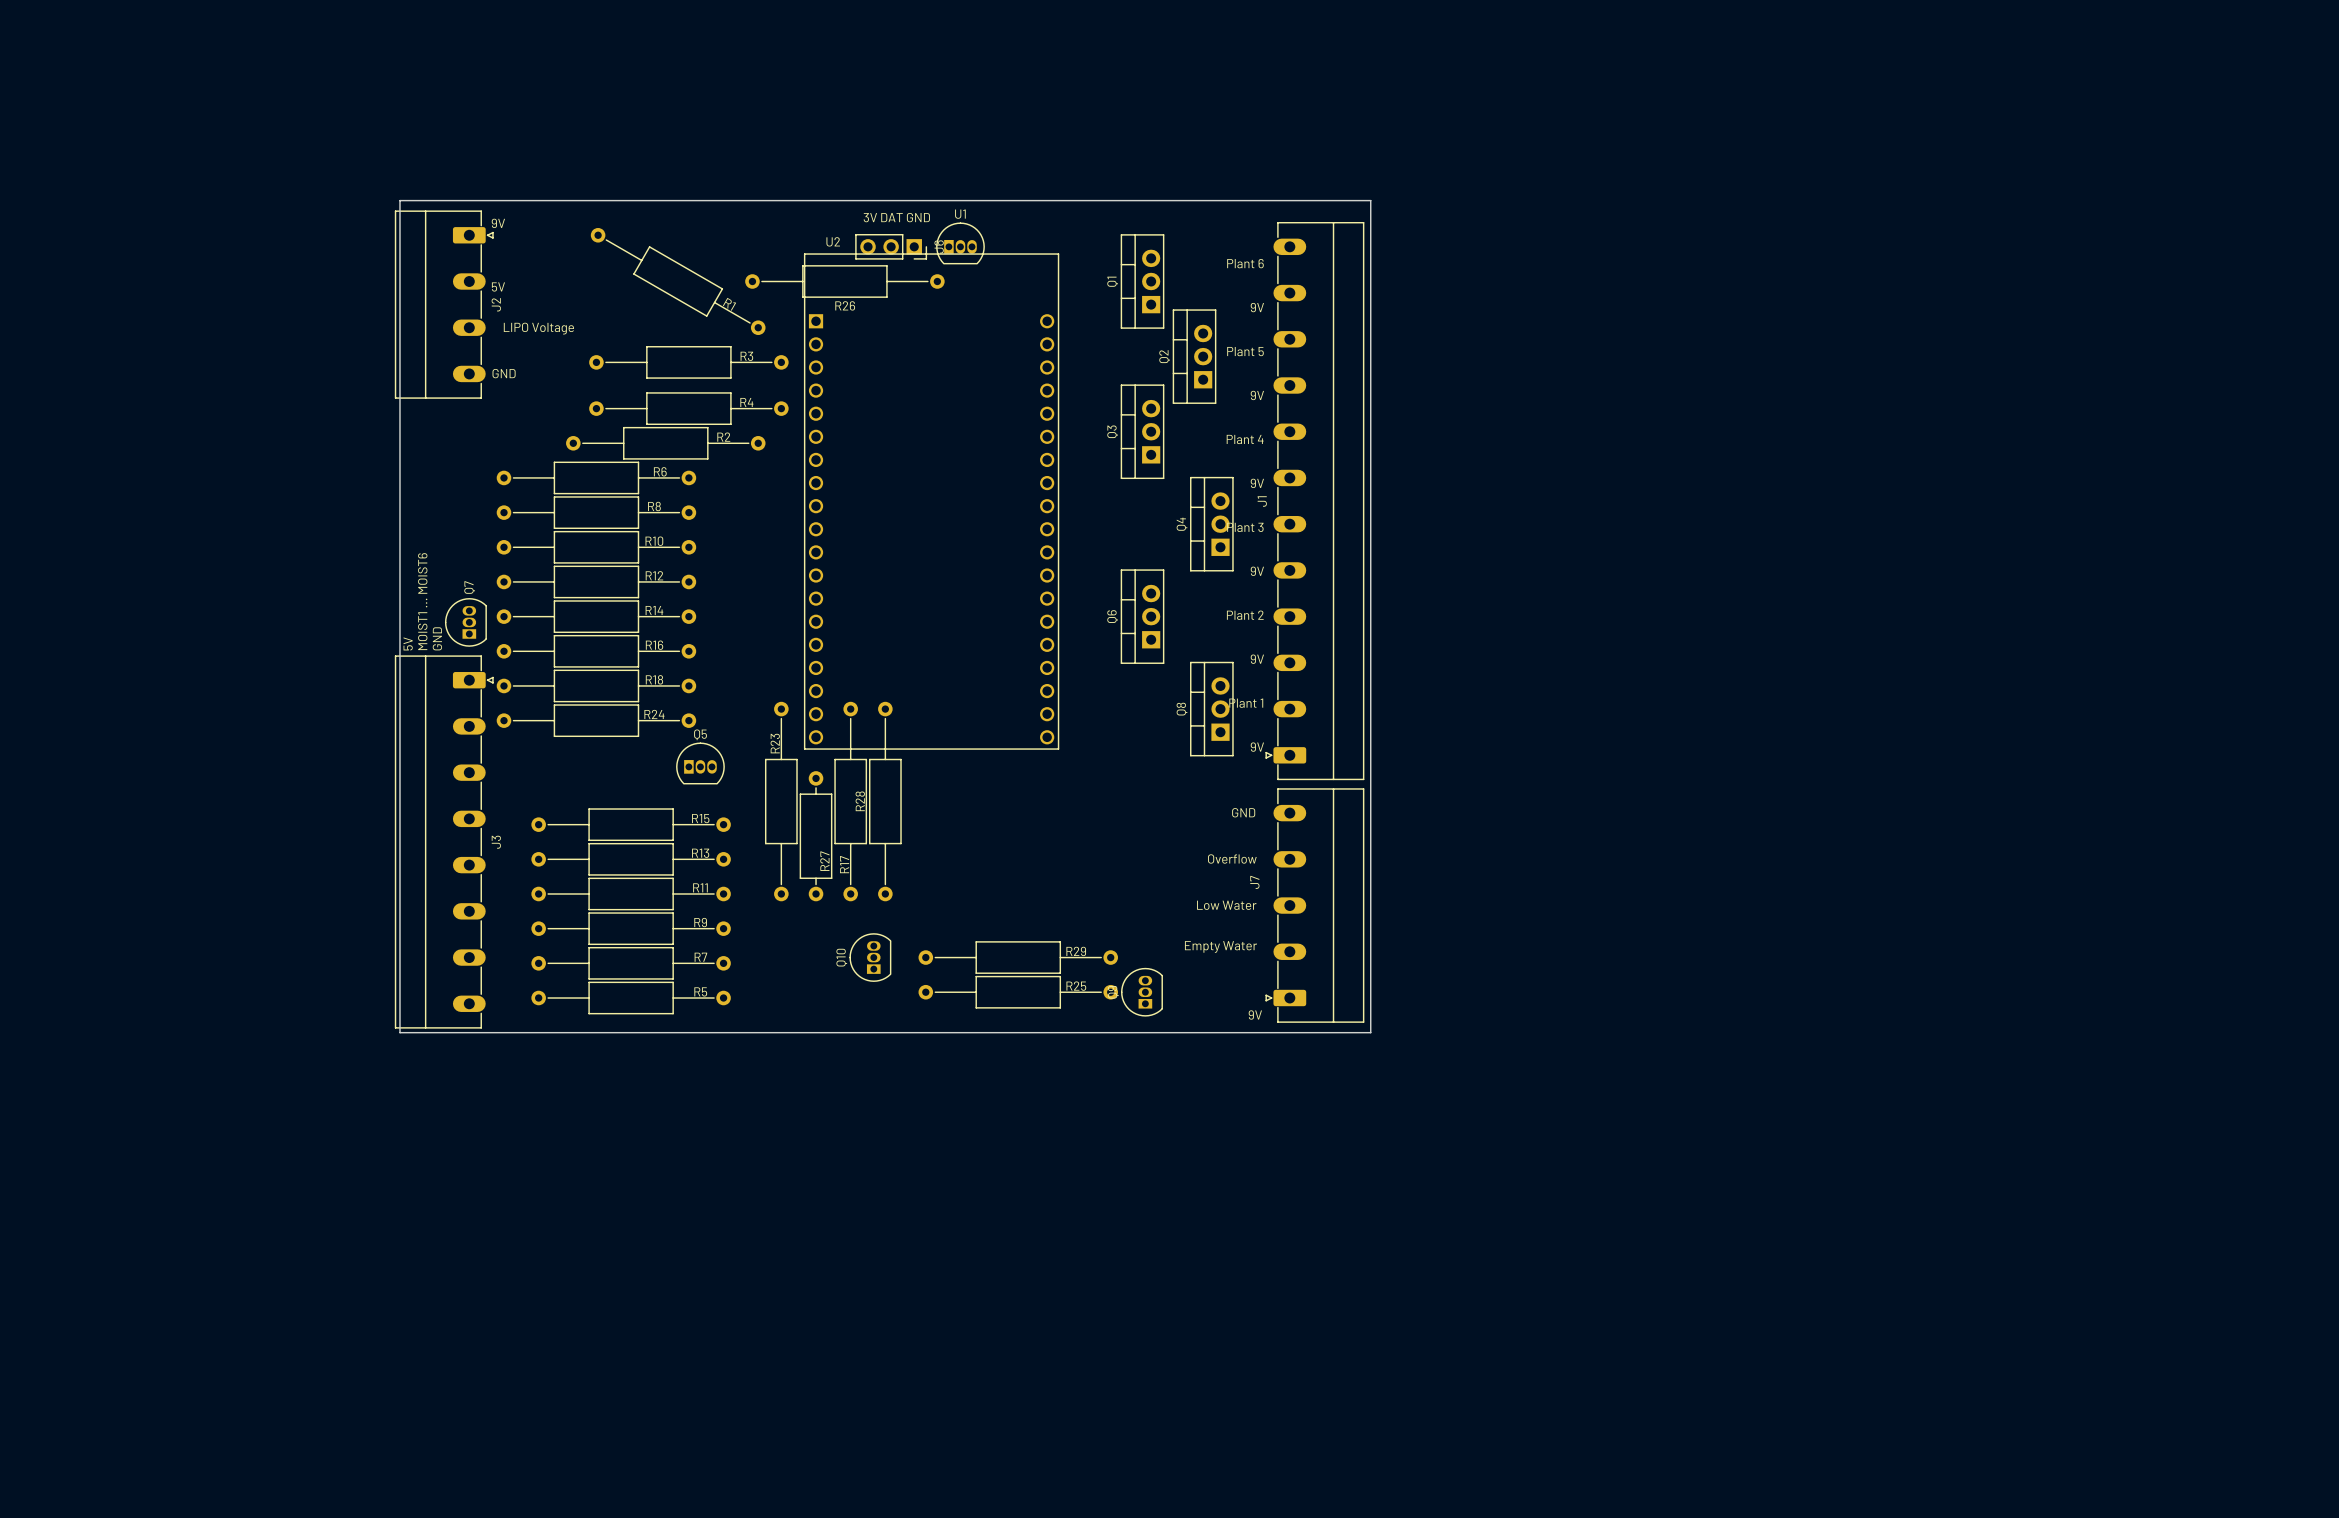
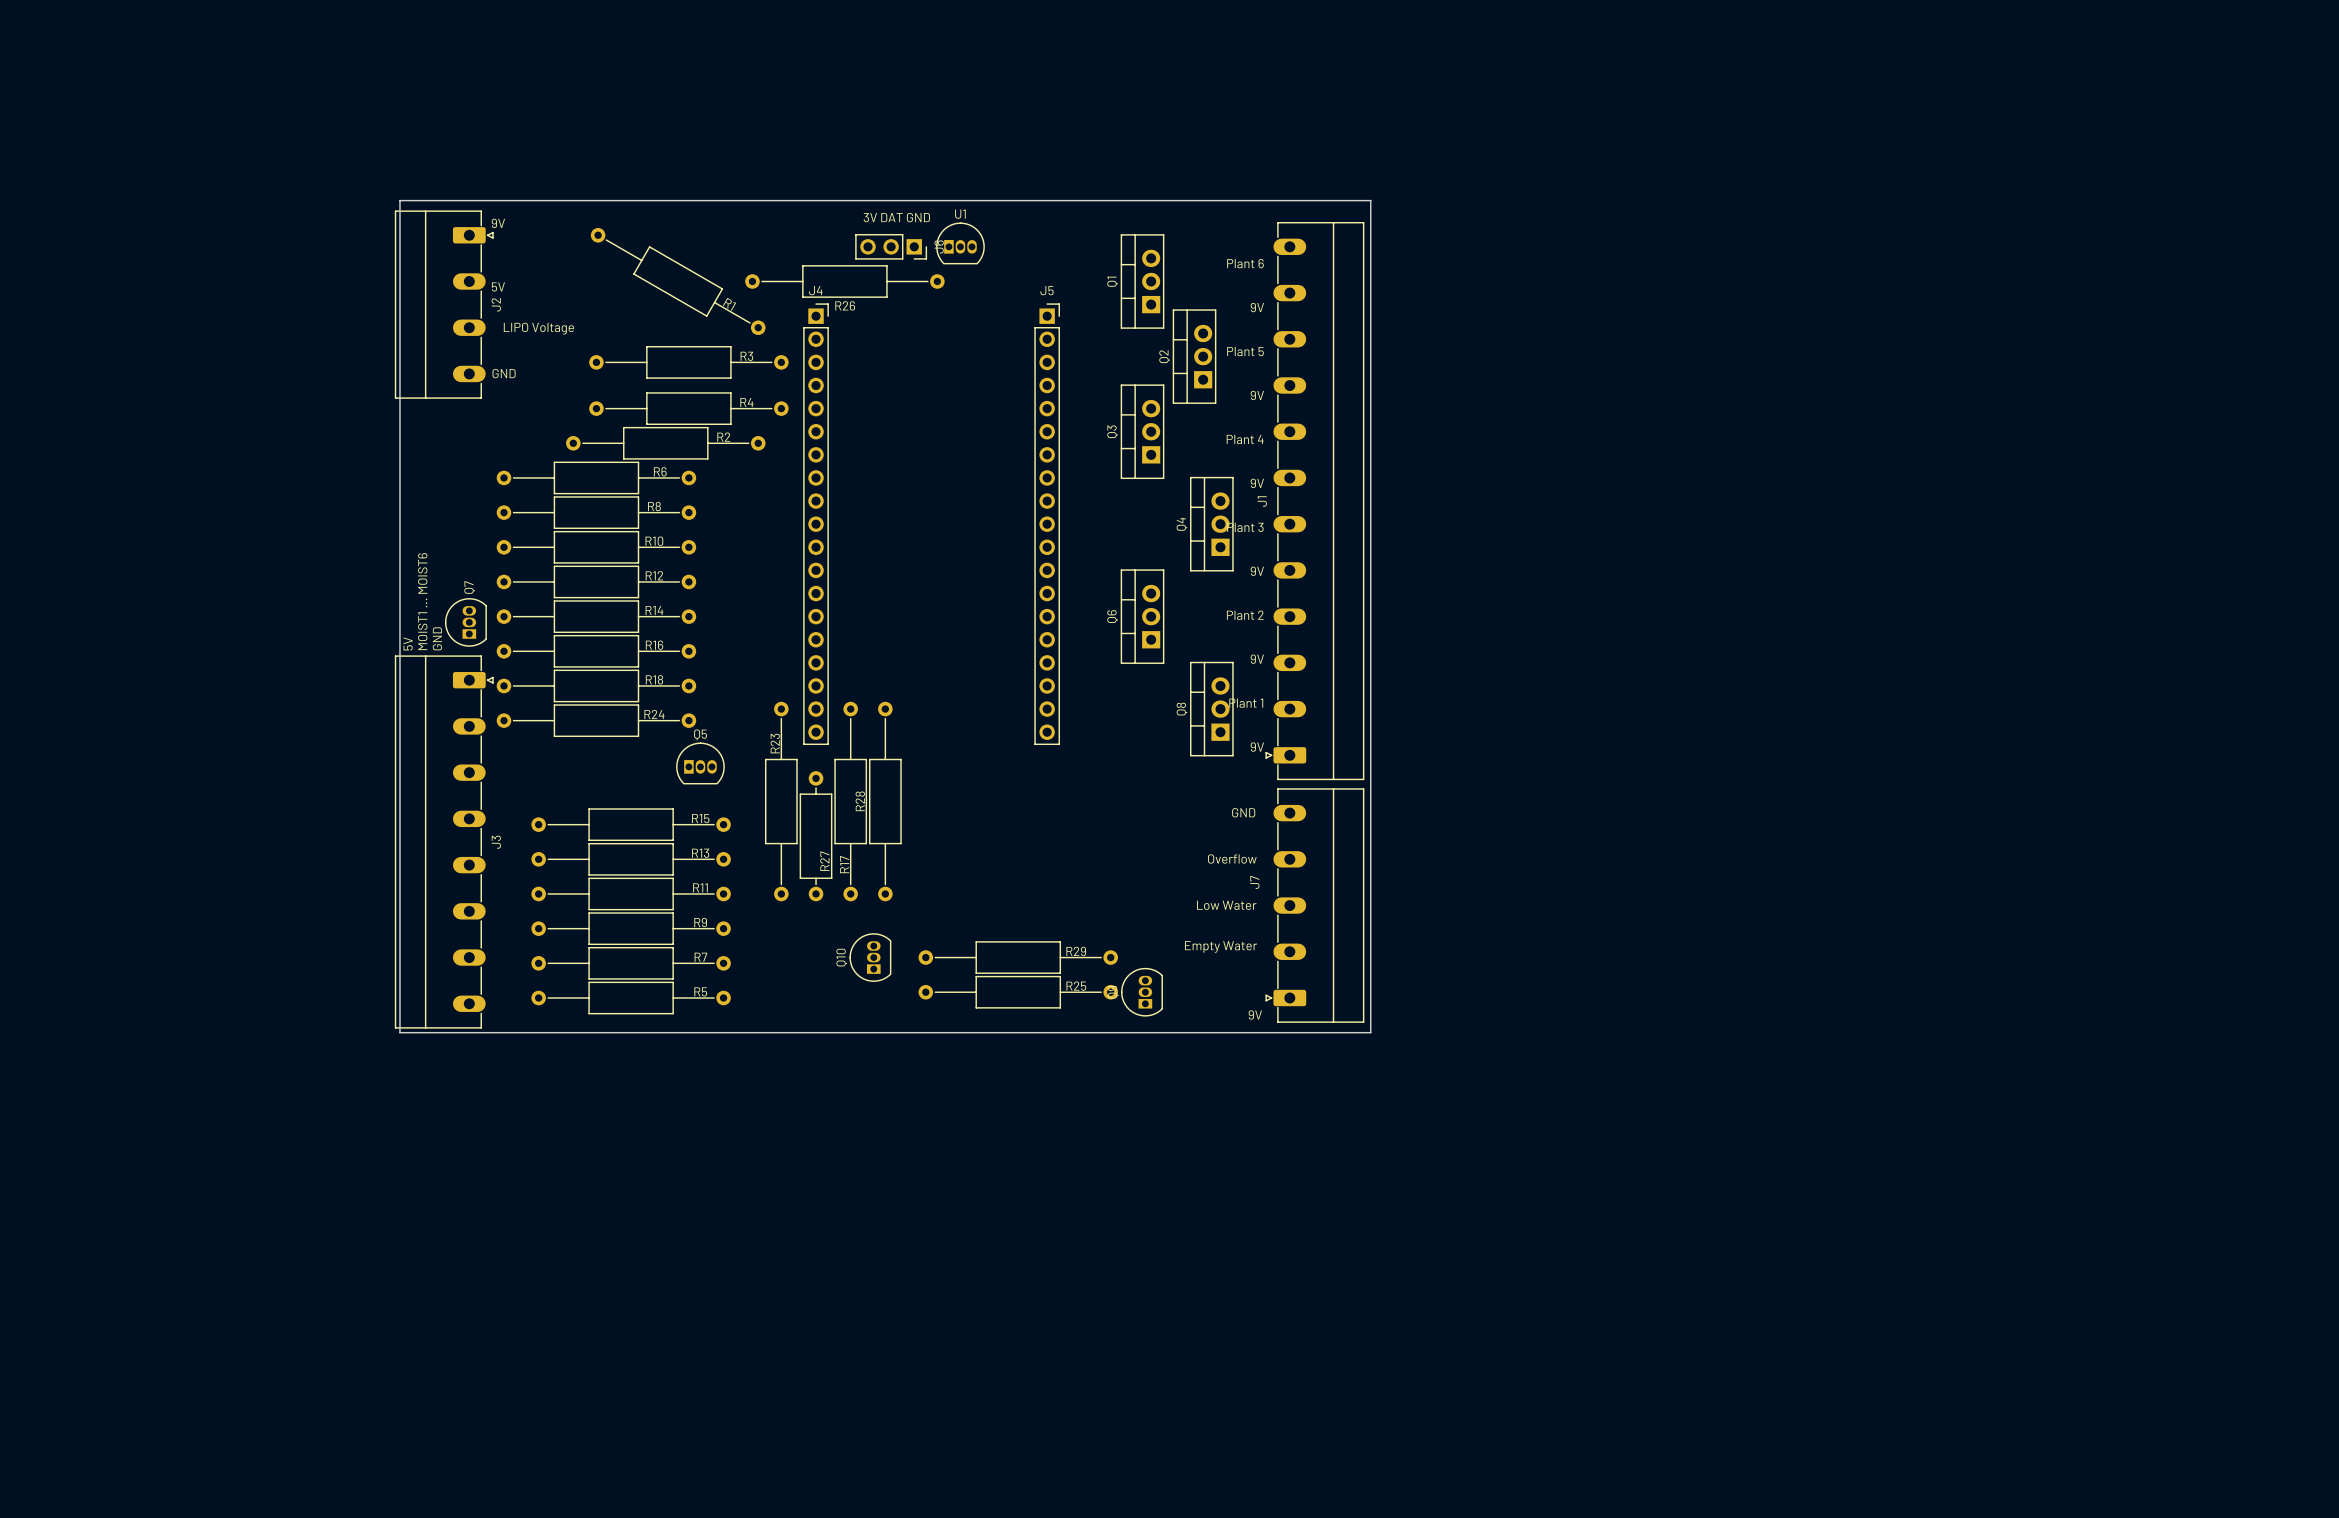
U2: (931, 501) -> none
J4: none -> (816, 524)
J5: none -> (1047, 524)

